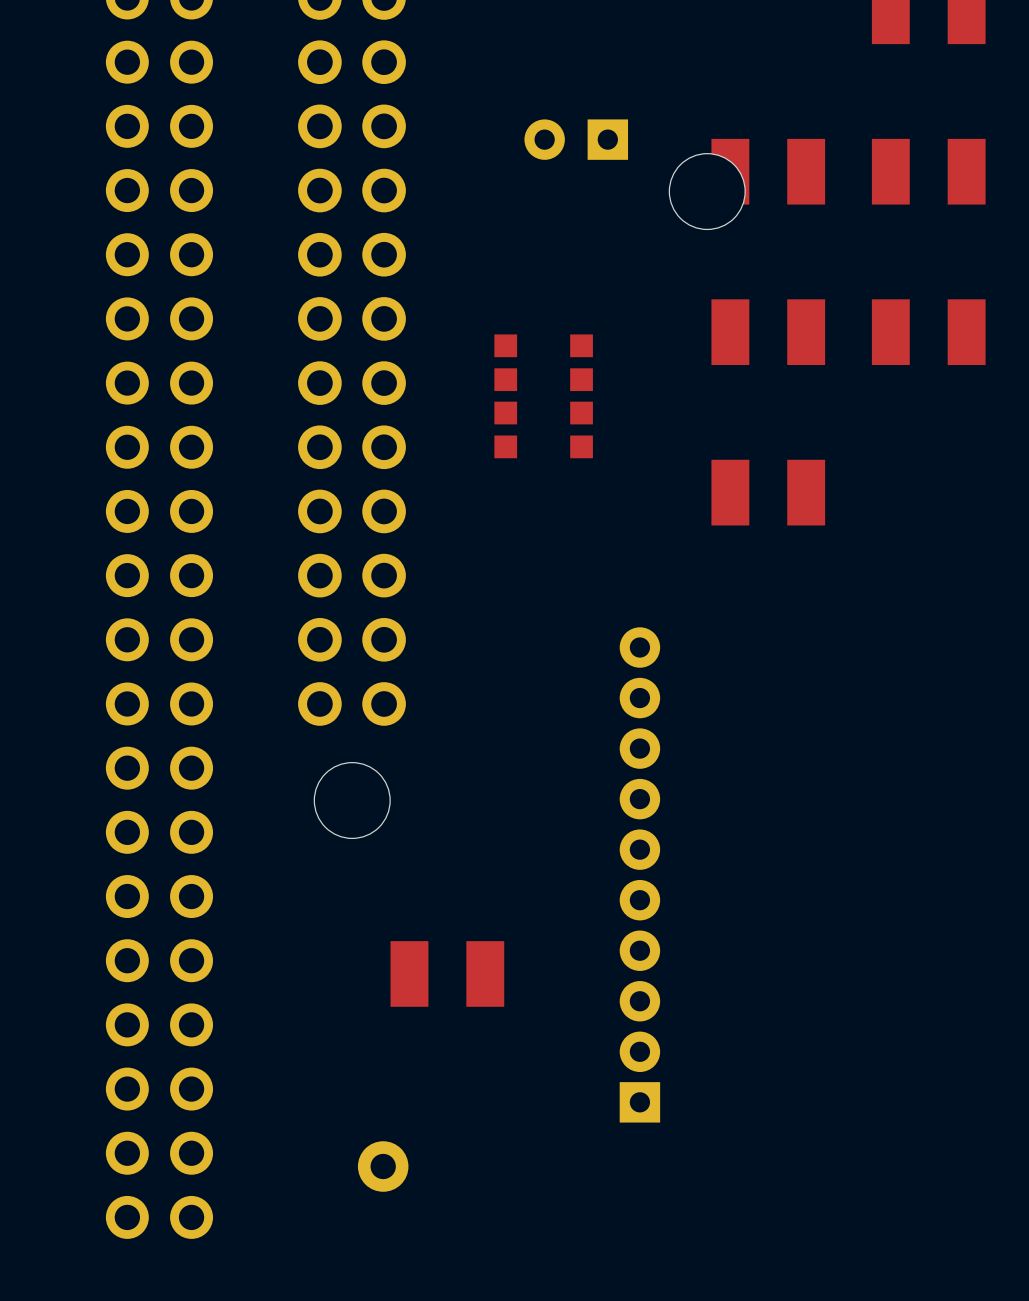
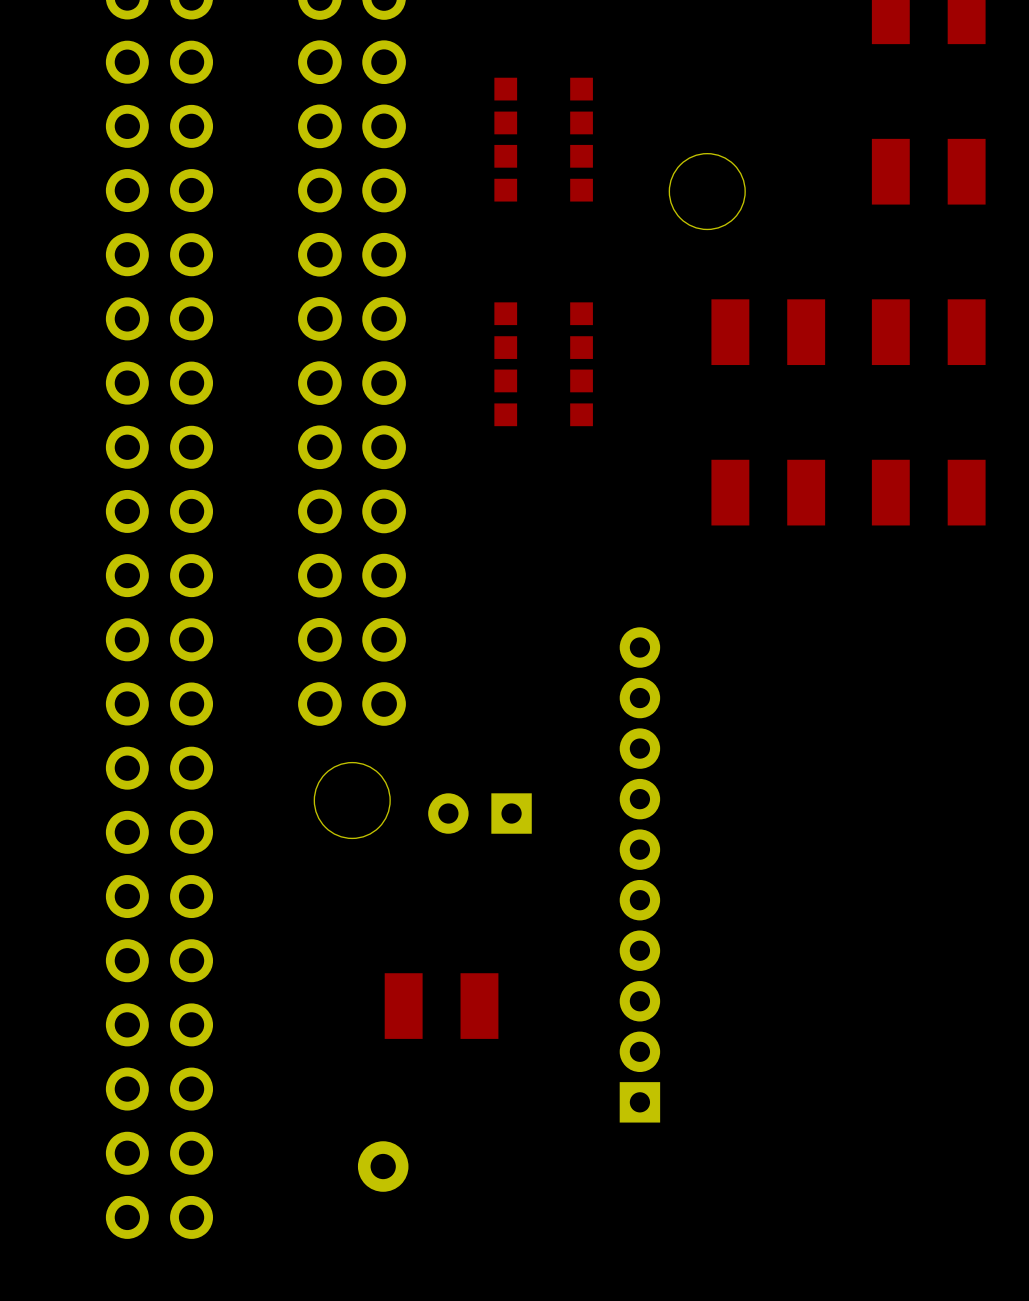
part: none -> (543, 139)
part: (576, 139) -> none
part: (768, 171) -> none
part position: (543, 396) -> (543, 364)
part: none -> (928, 492)
part: none -> (479, 813)
part position: (447, 973) -> (441, 1006)

